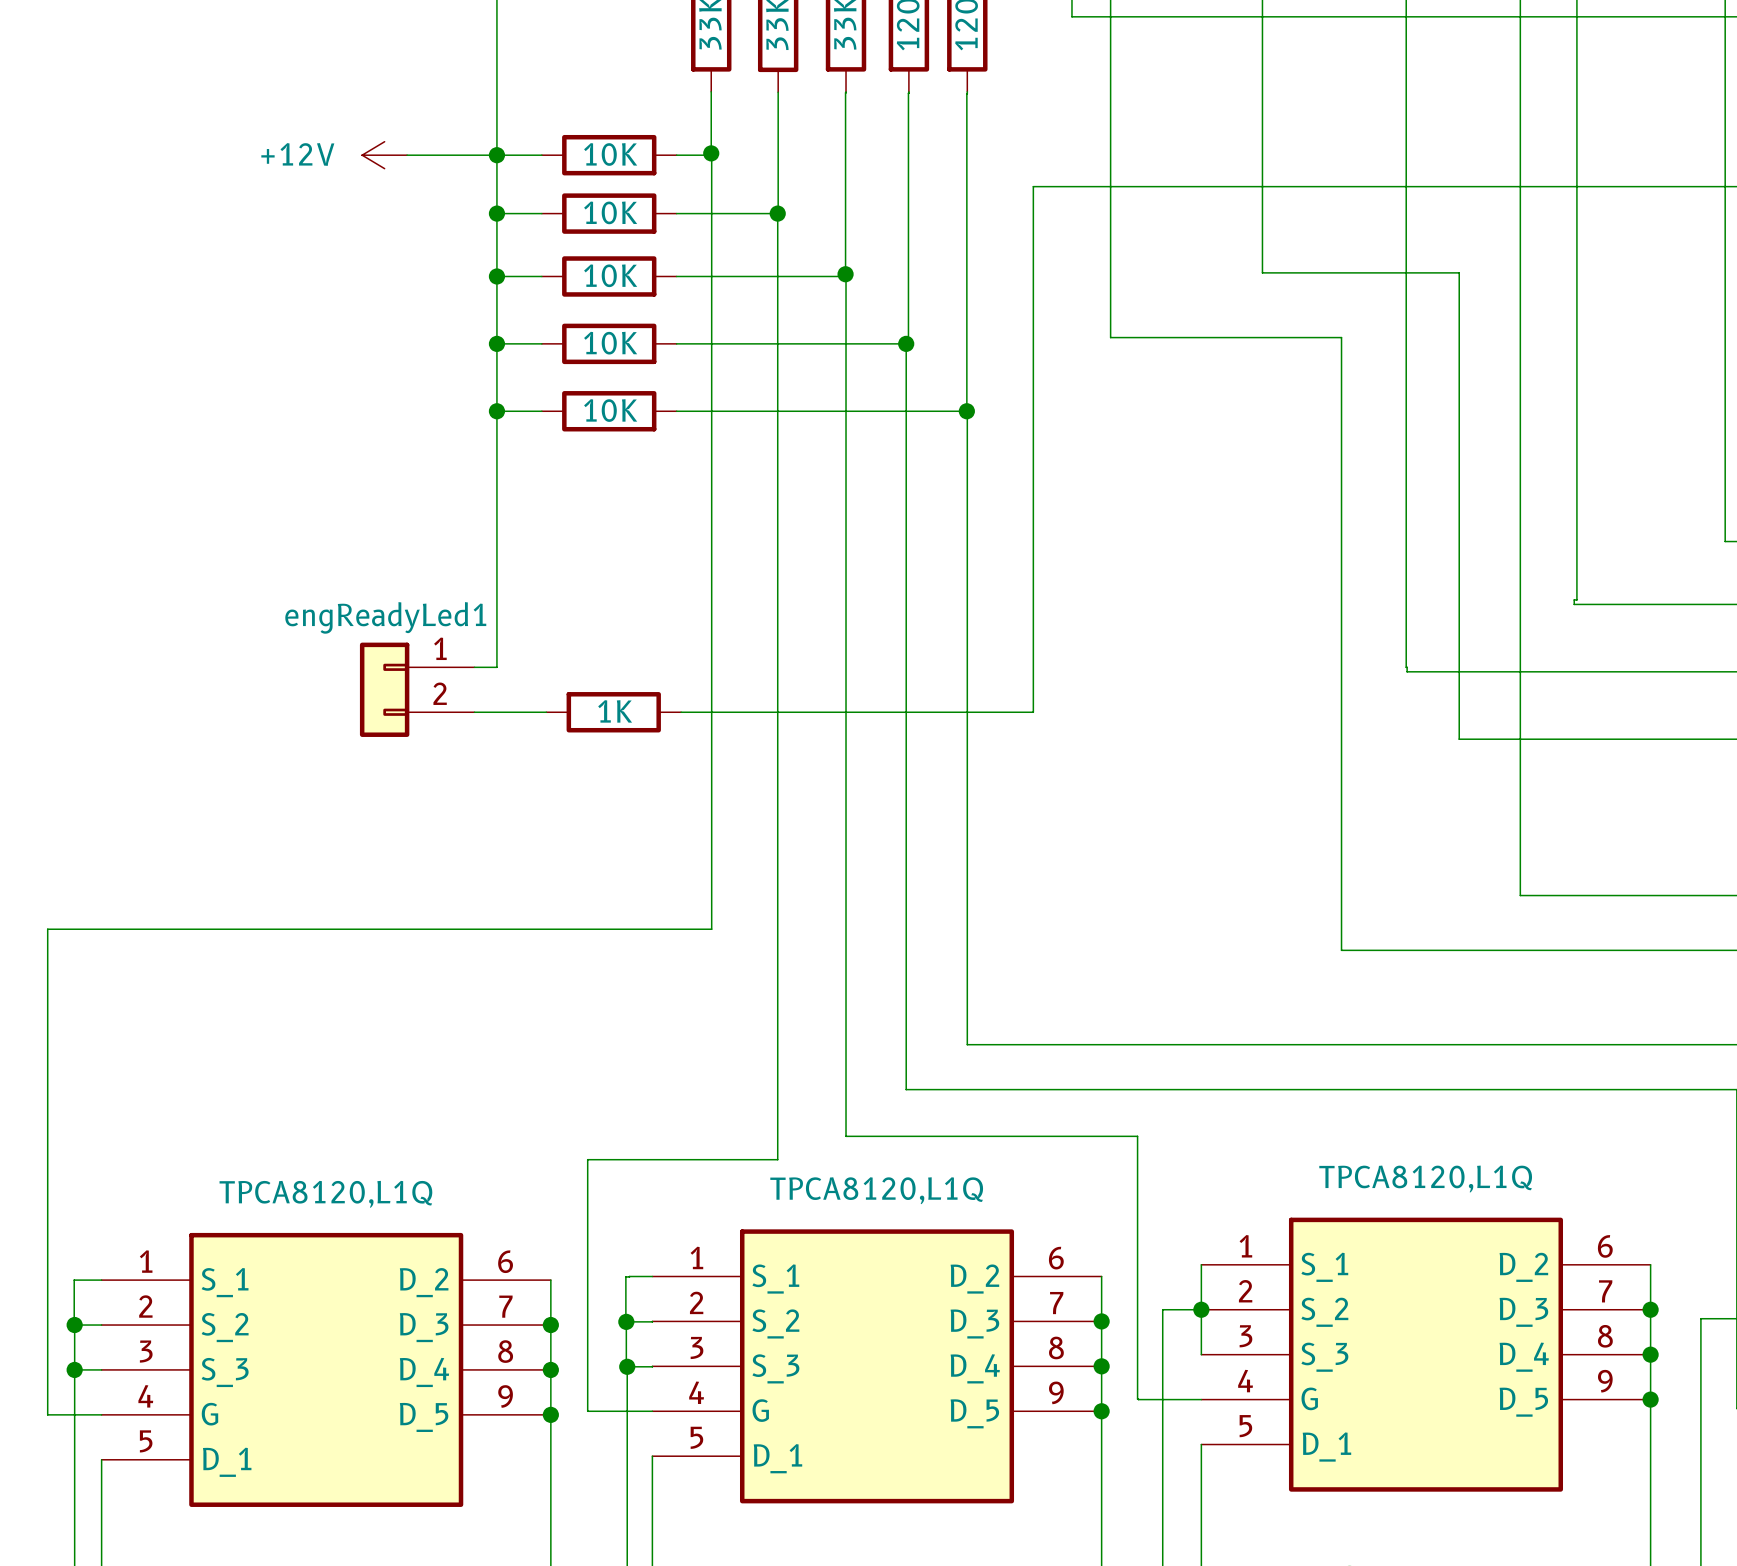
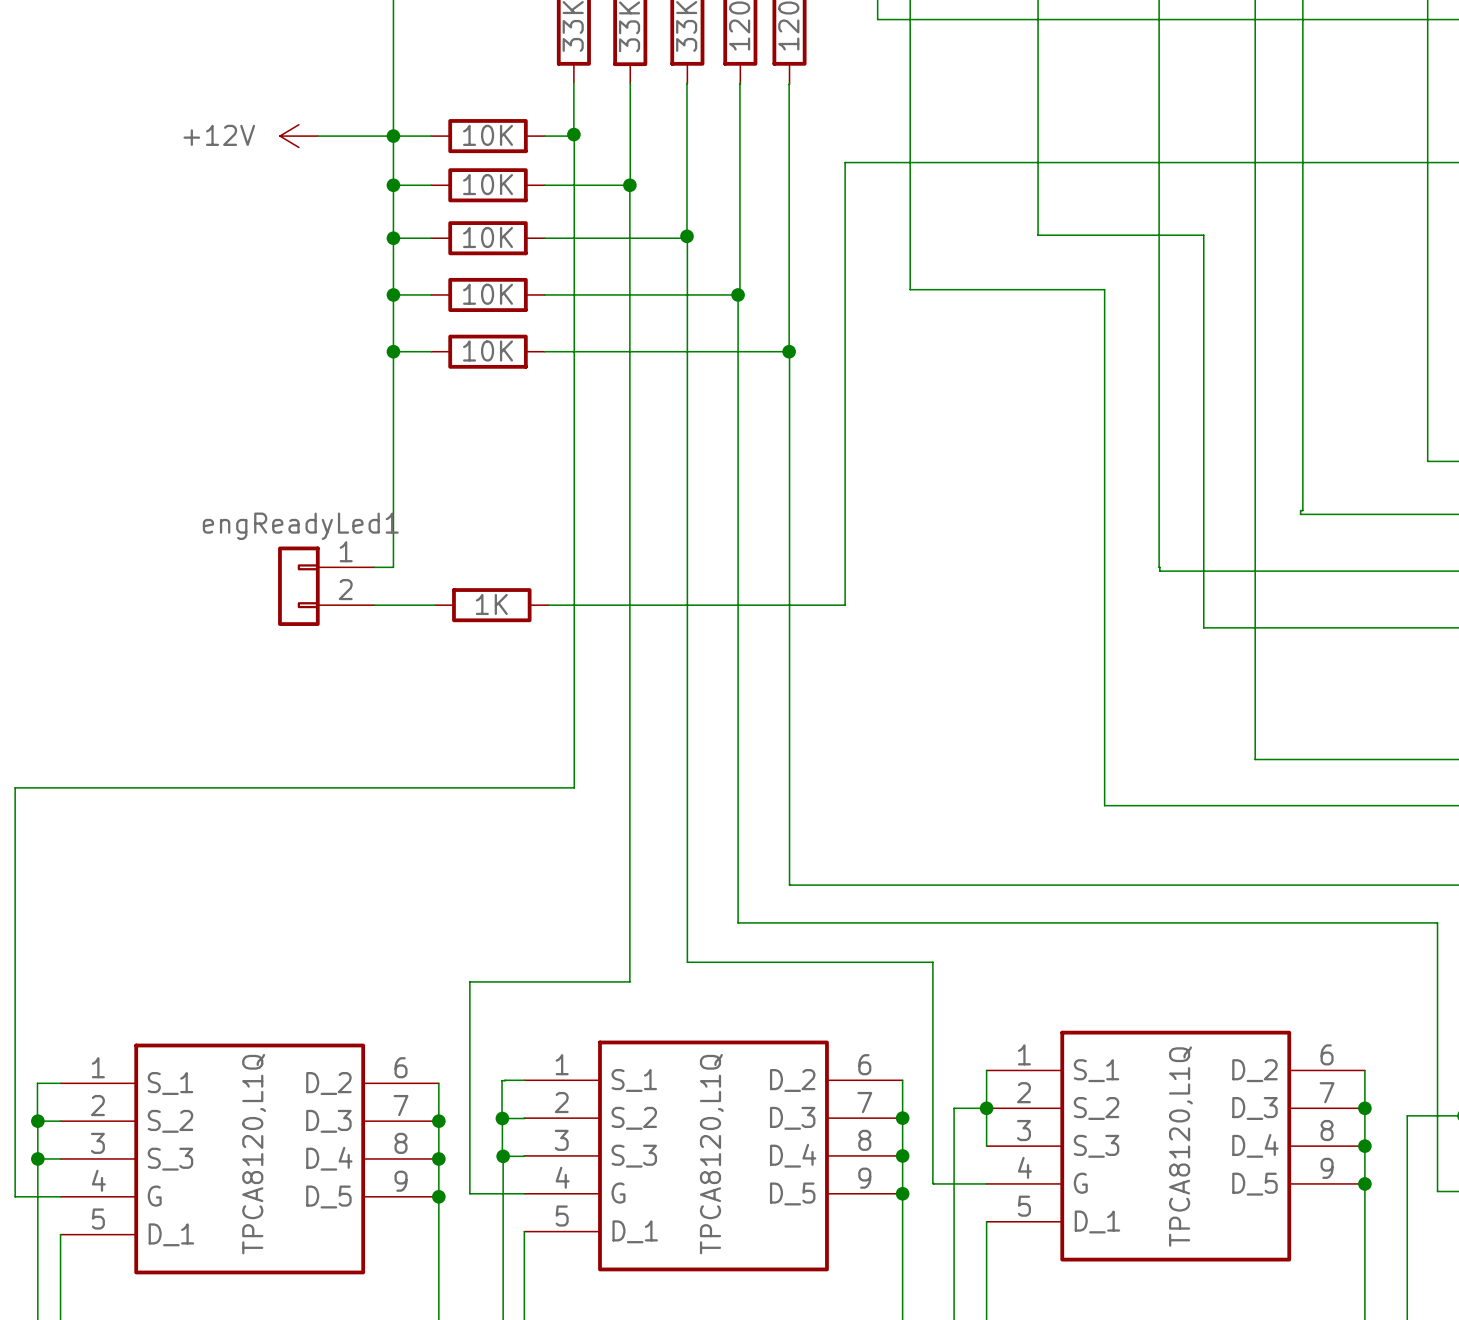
part value rotation: 0° (1425, 1179) -> 90° counterclockwise (1180, 1146)
part value rotation: 0° (876, 1190) -> 90° counterclockwise (711, 1154)
part value rotation: 0° (325, 1194) -> 90° counterclockwise (254, 1154)

